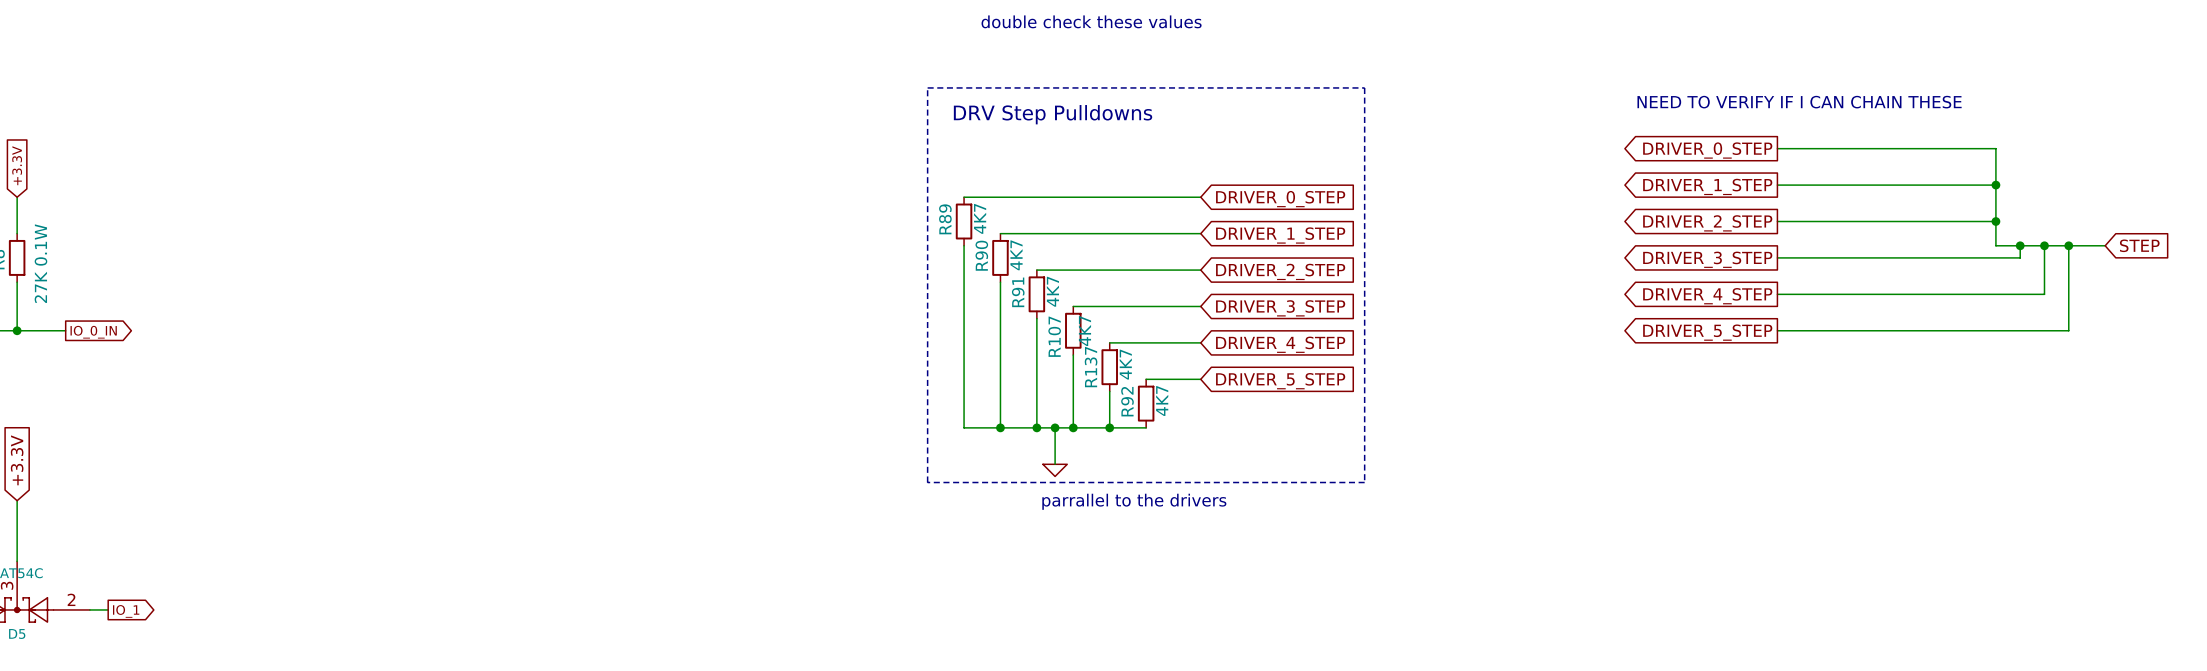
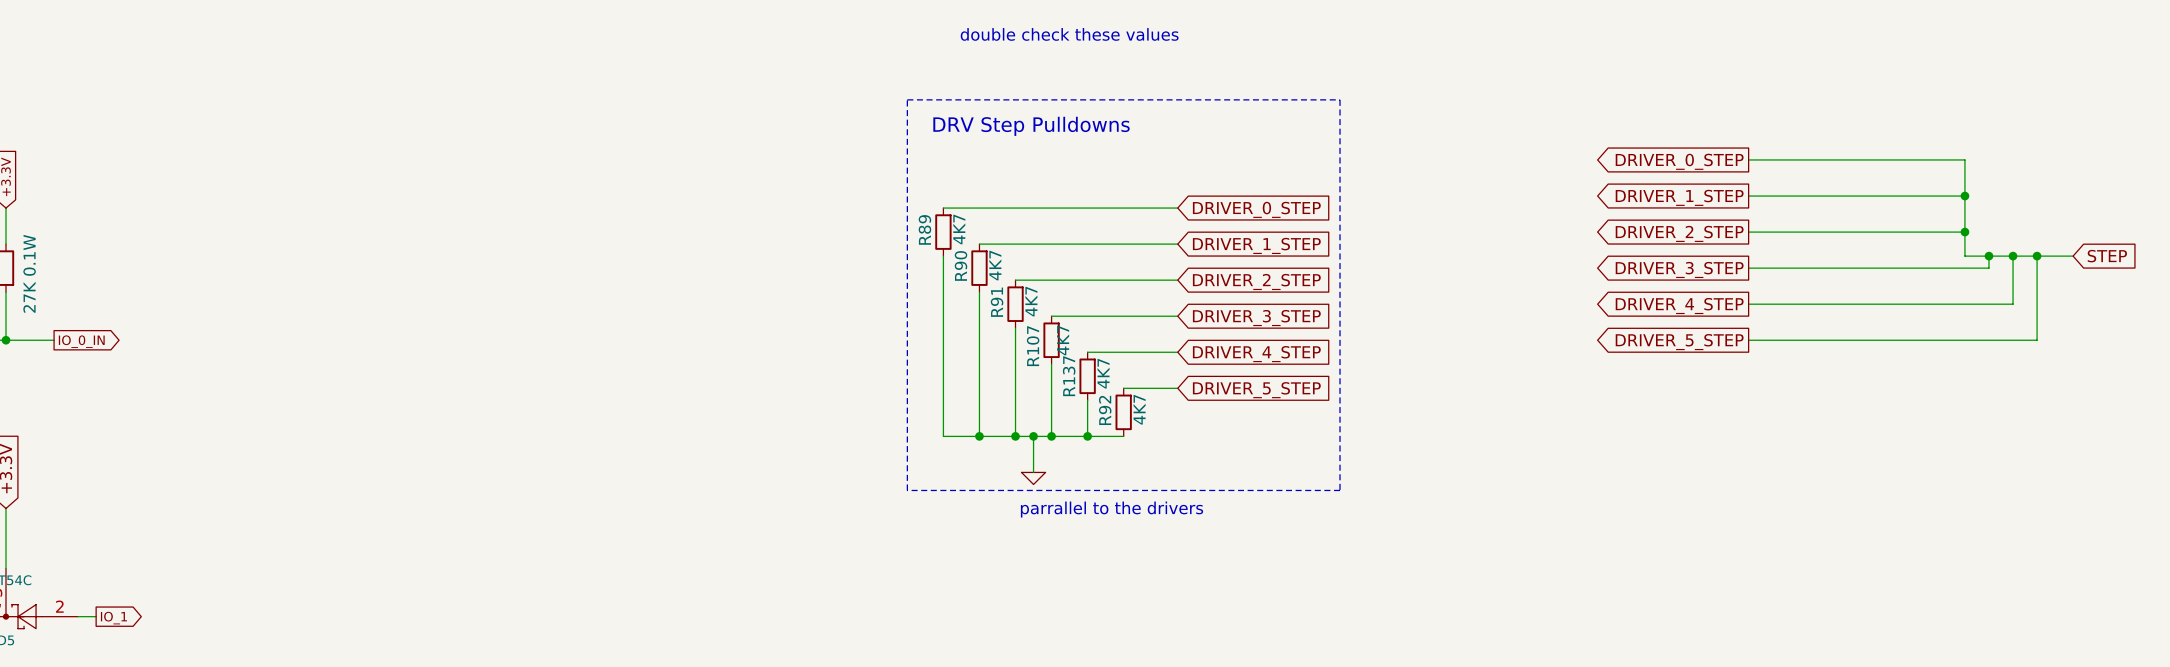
text: NEED TO VERIFY IF I CAN CHAIN THESE (1799, 102) -> none

